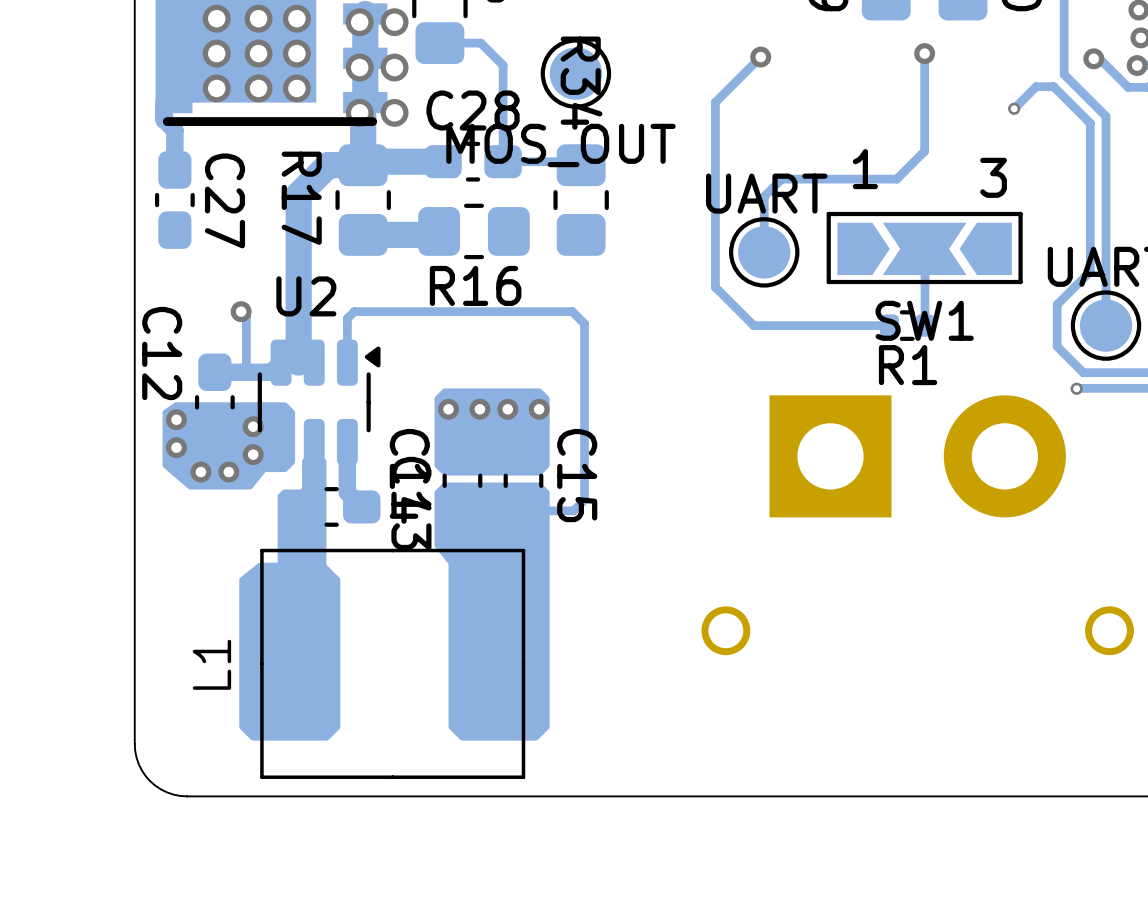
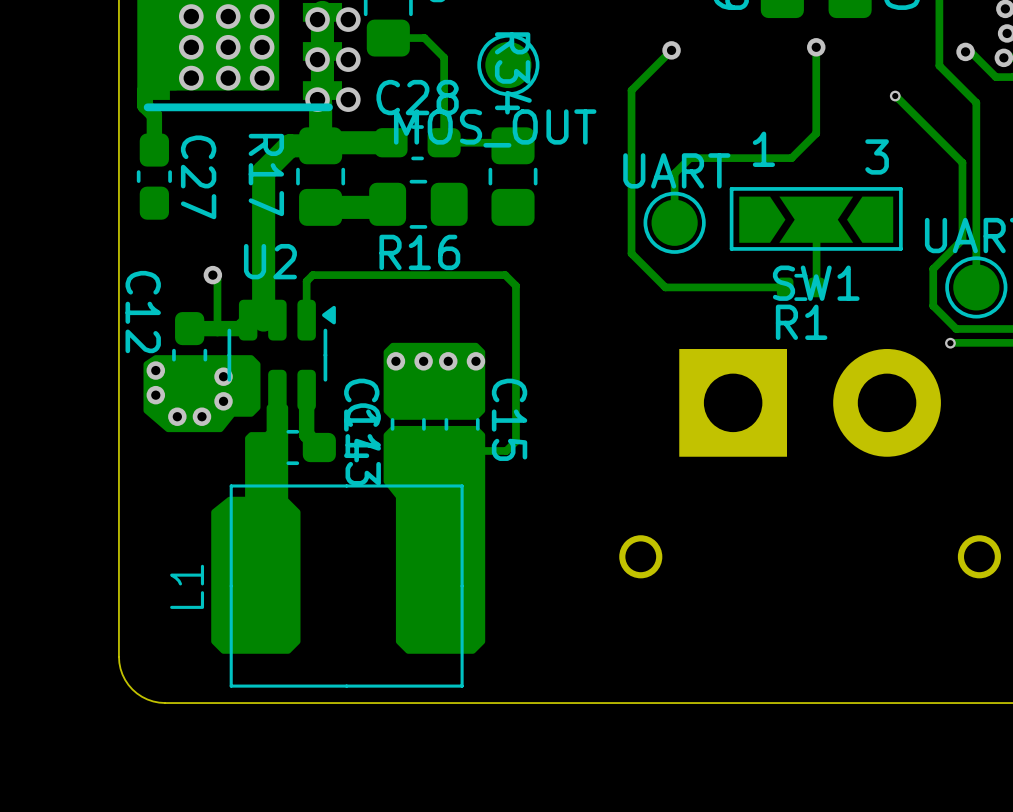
track: (1014, 108) (1036, 86) (1053, 86) (1090, 123) (1090, 184) -> (895, 96) (962, 162)

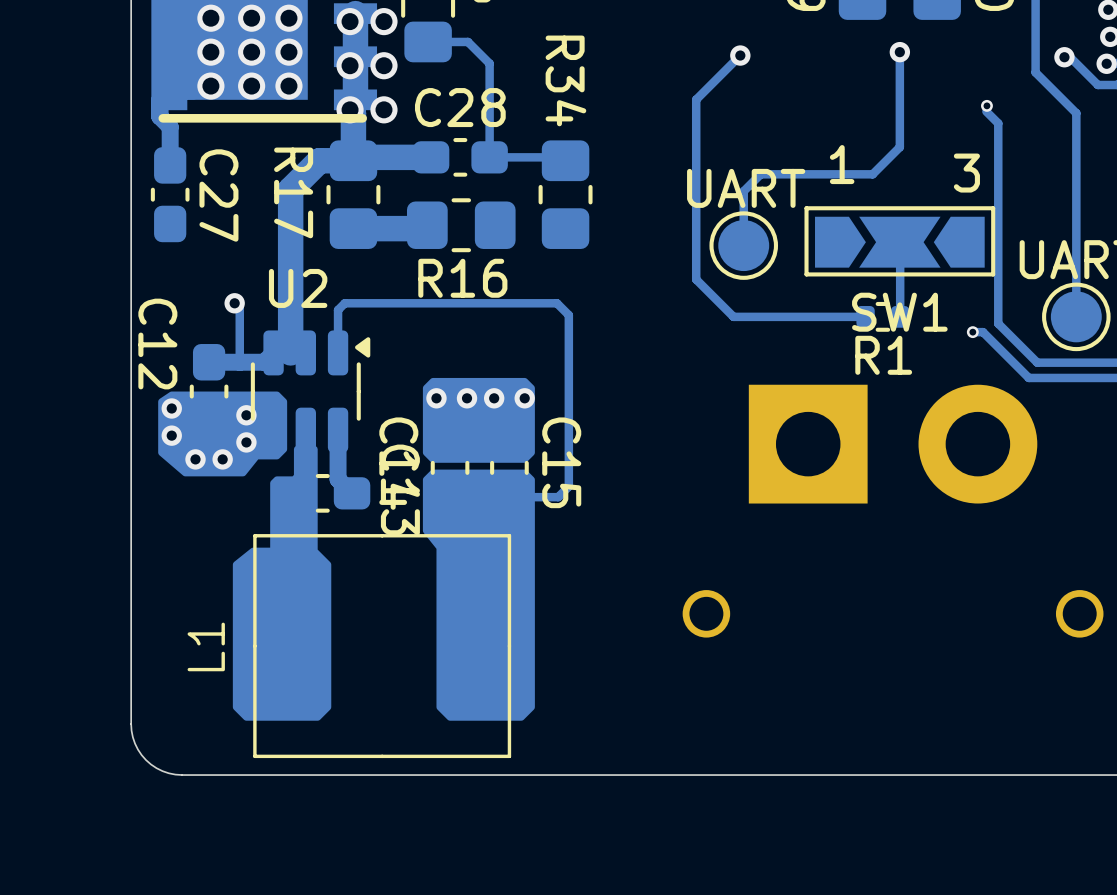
MOS_OUT: (508, 65) -> none
track: (895, 96) (962, 162) (962, 239) (933, 268) (933, 305) (956, 328) -> (986, 111) (998, 123) (998, 323) (1037, 362) (1054, 362)
track: none -> (972, 332) (983, 332) (1028, 377) (1047, 377)
via position: (950, 343) -> (972, 332)

